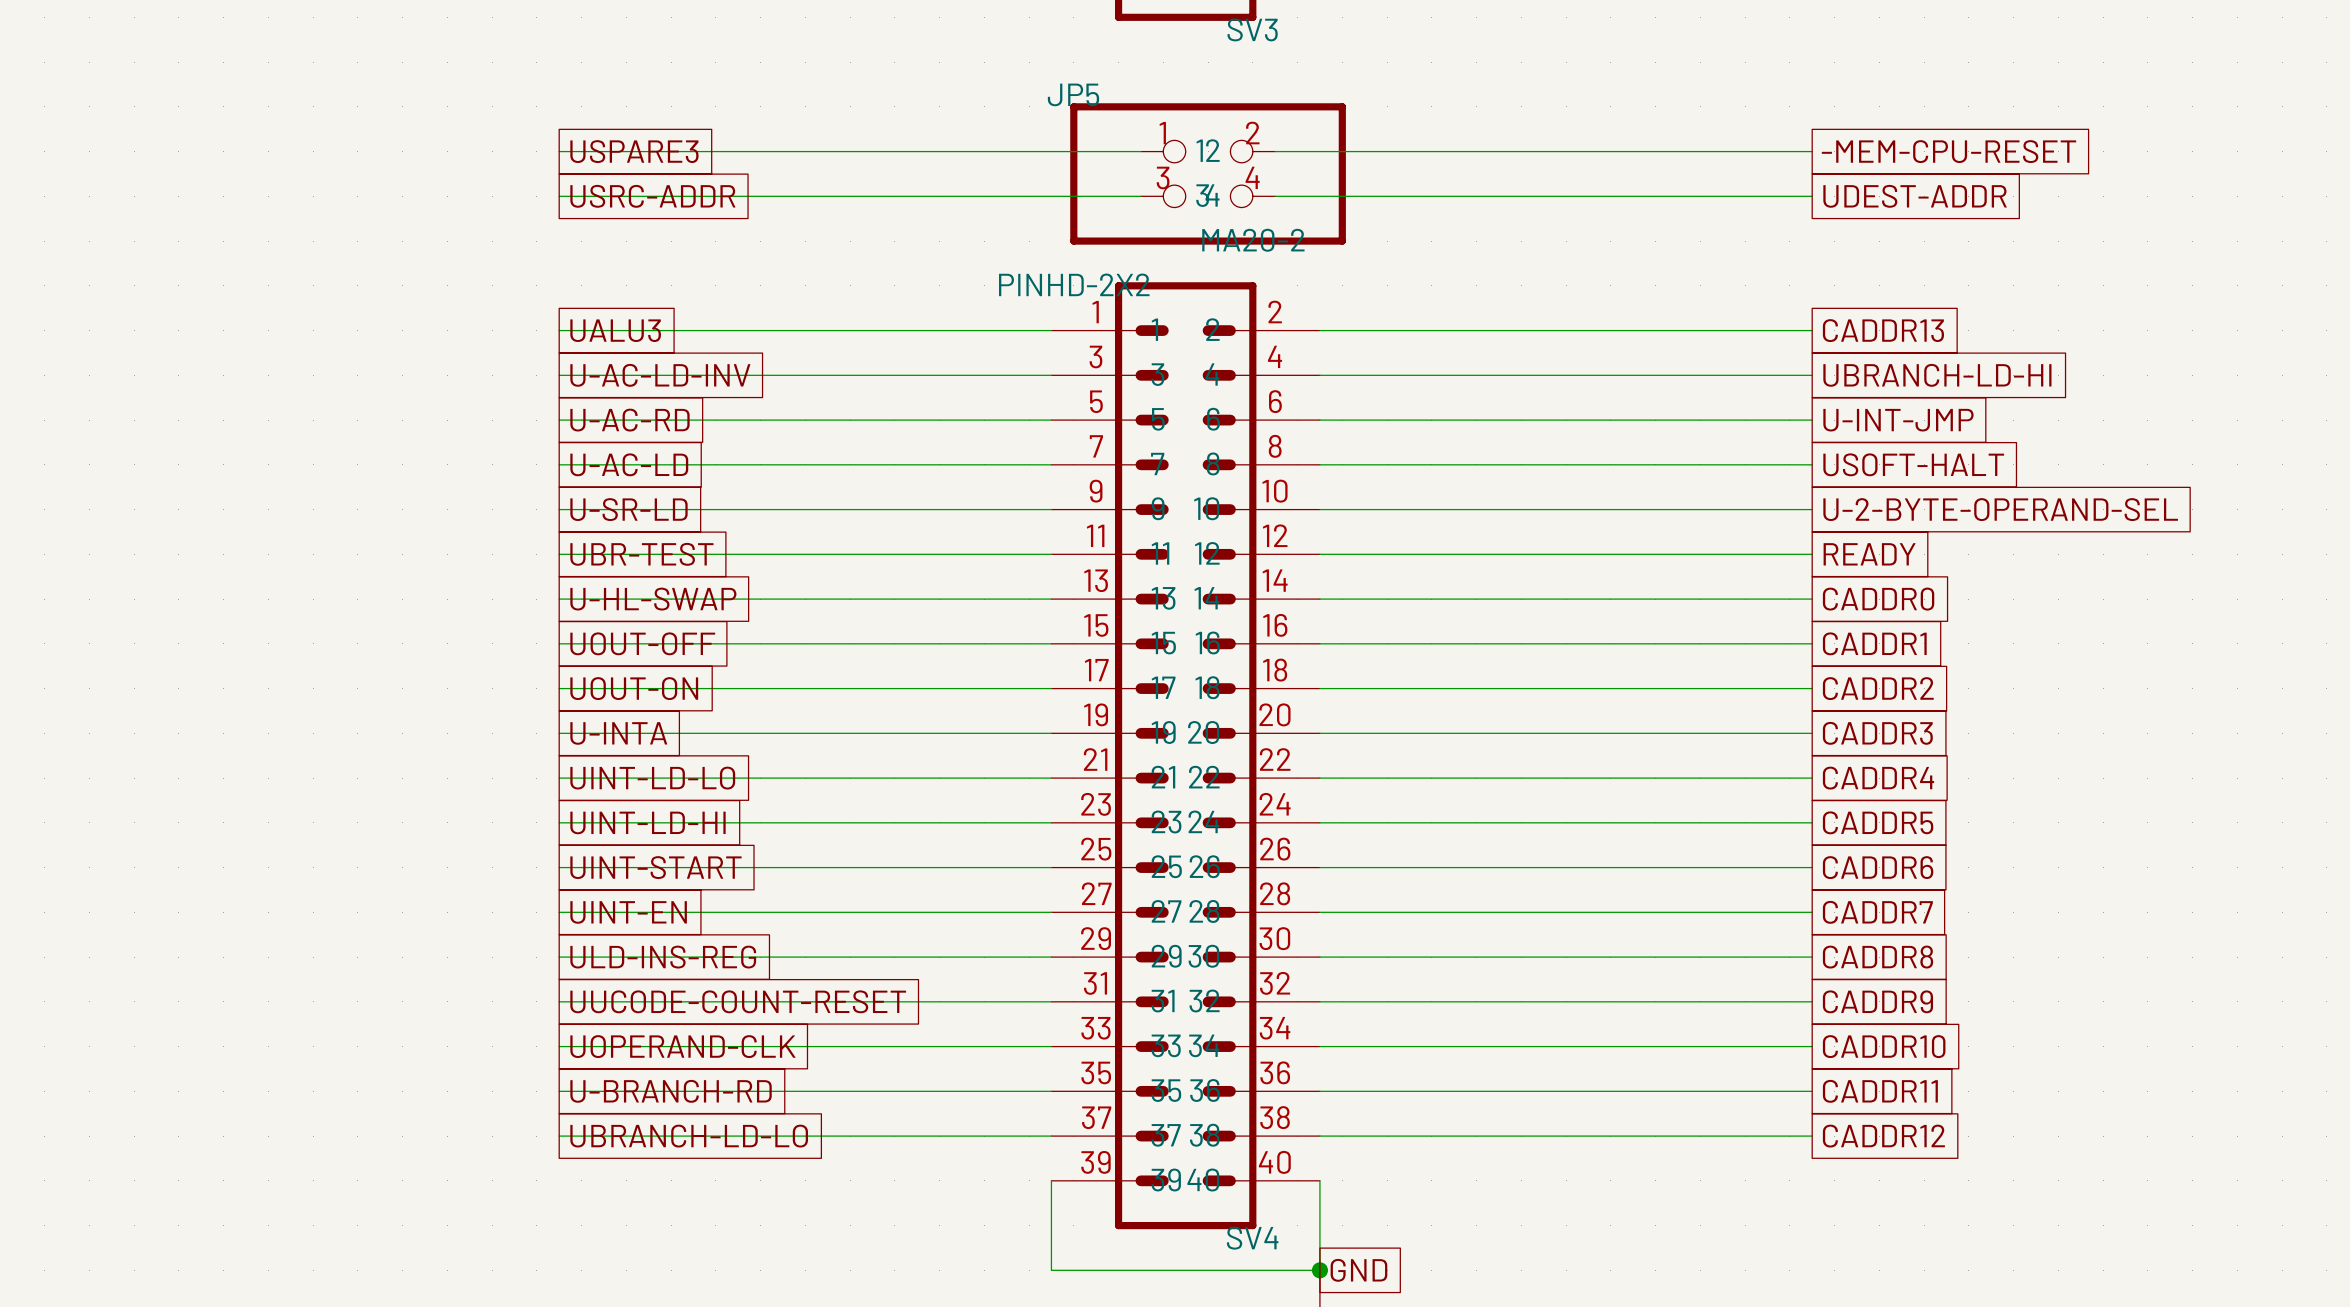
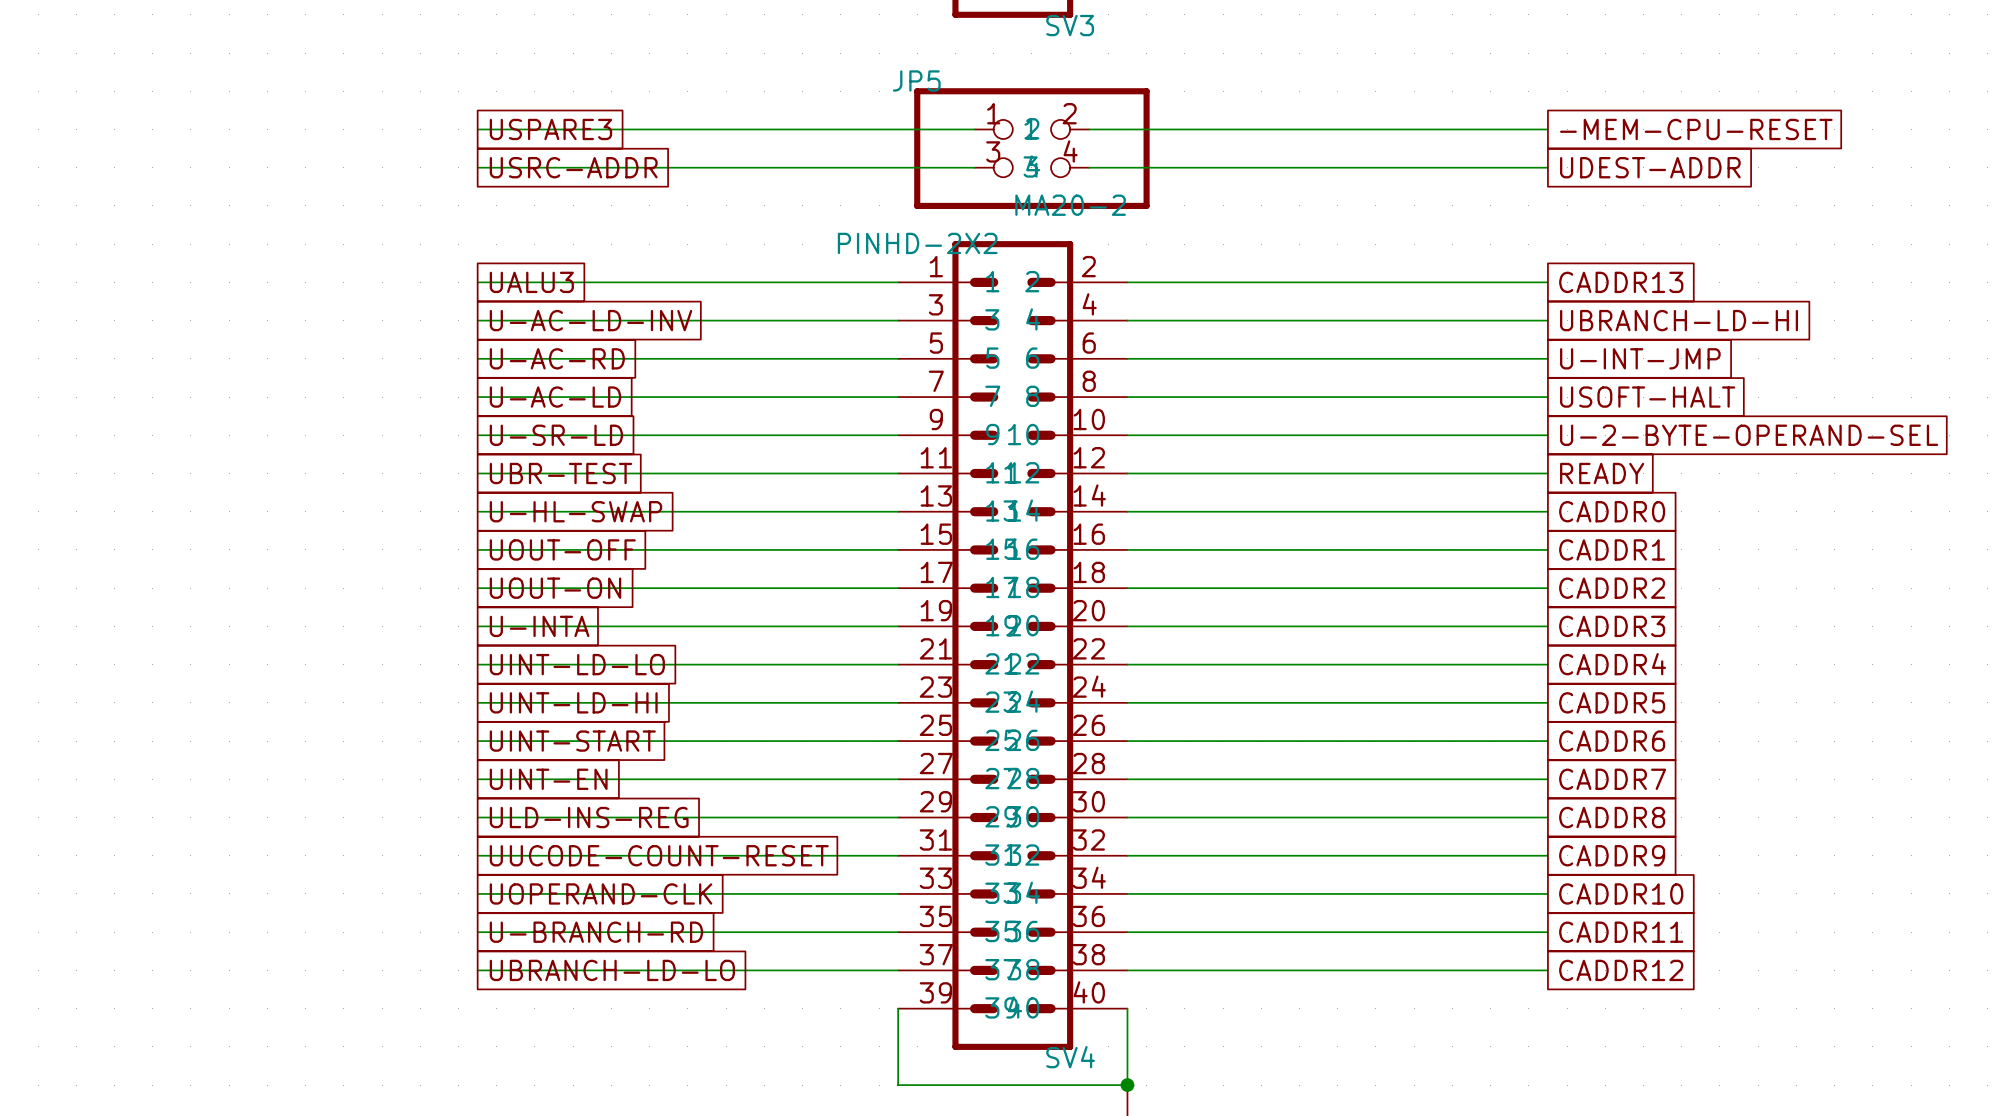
global label: GND (1358, 1270) -> none

